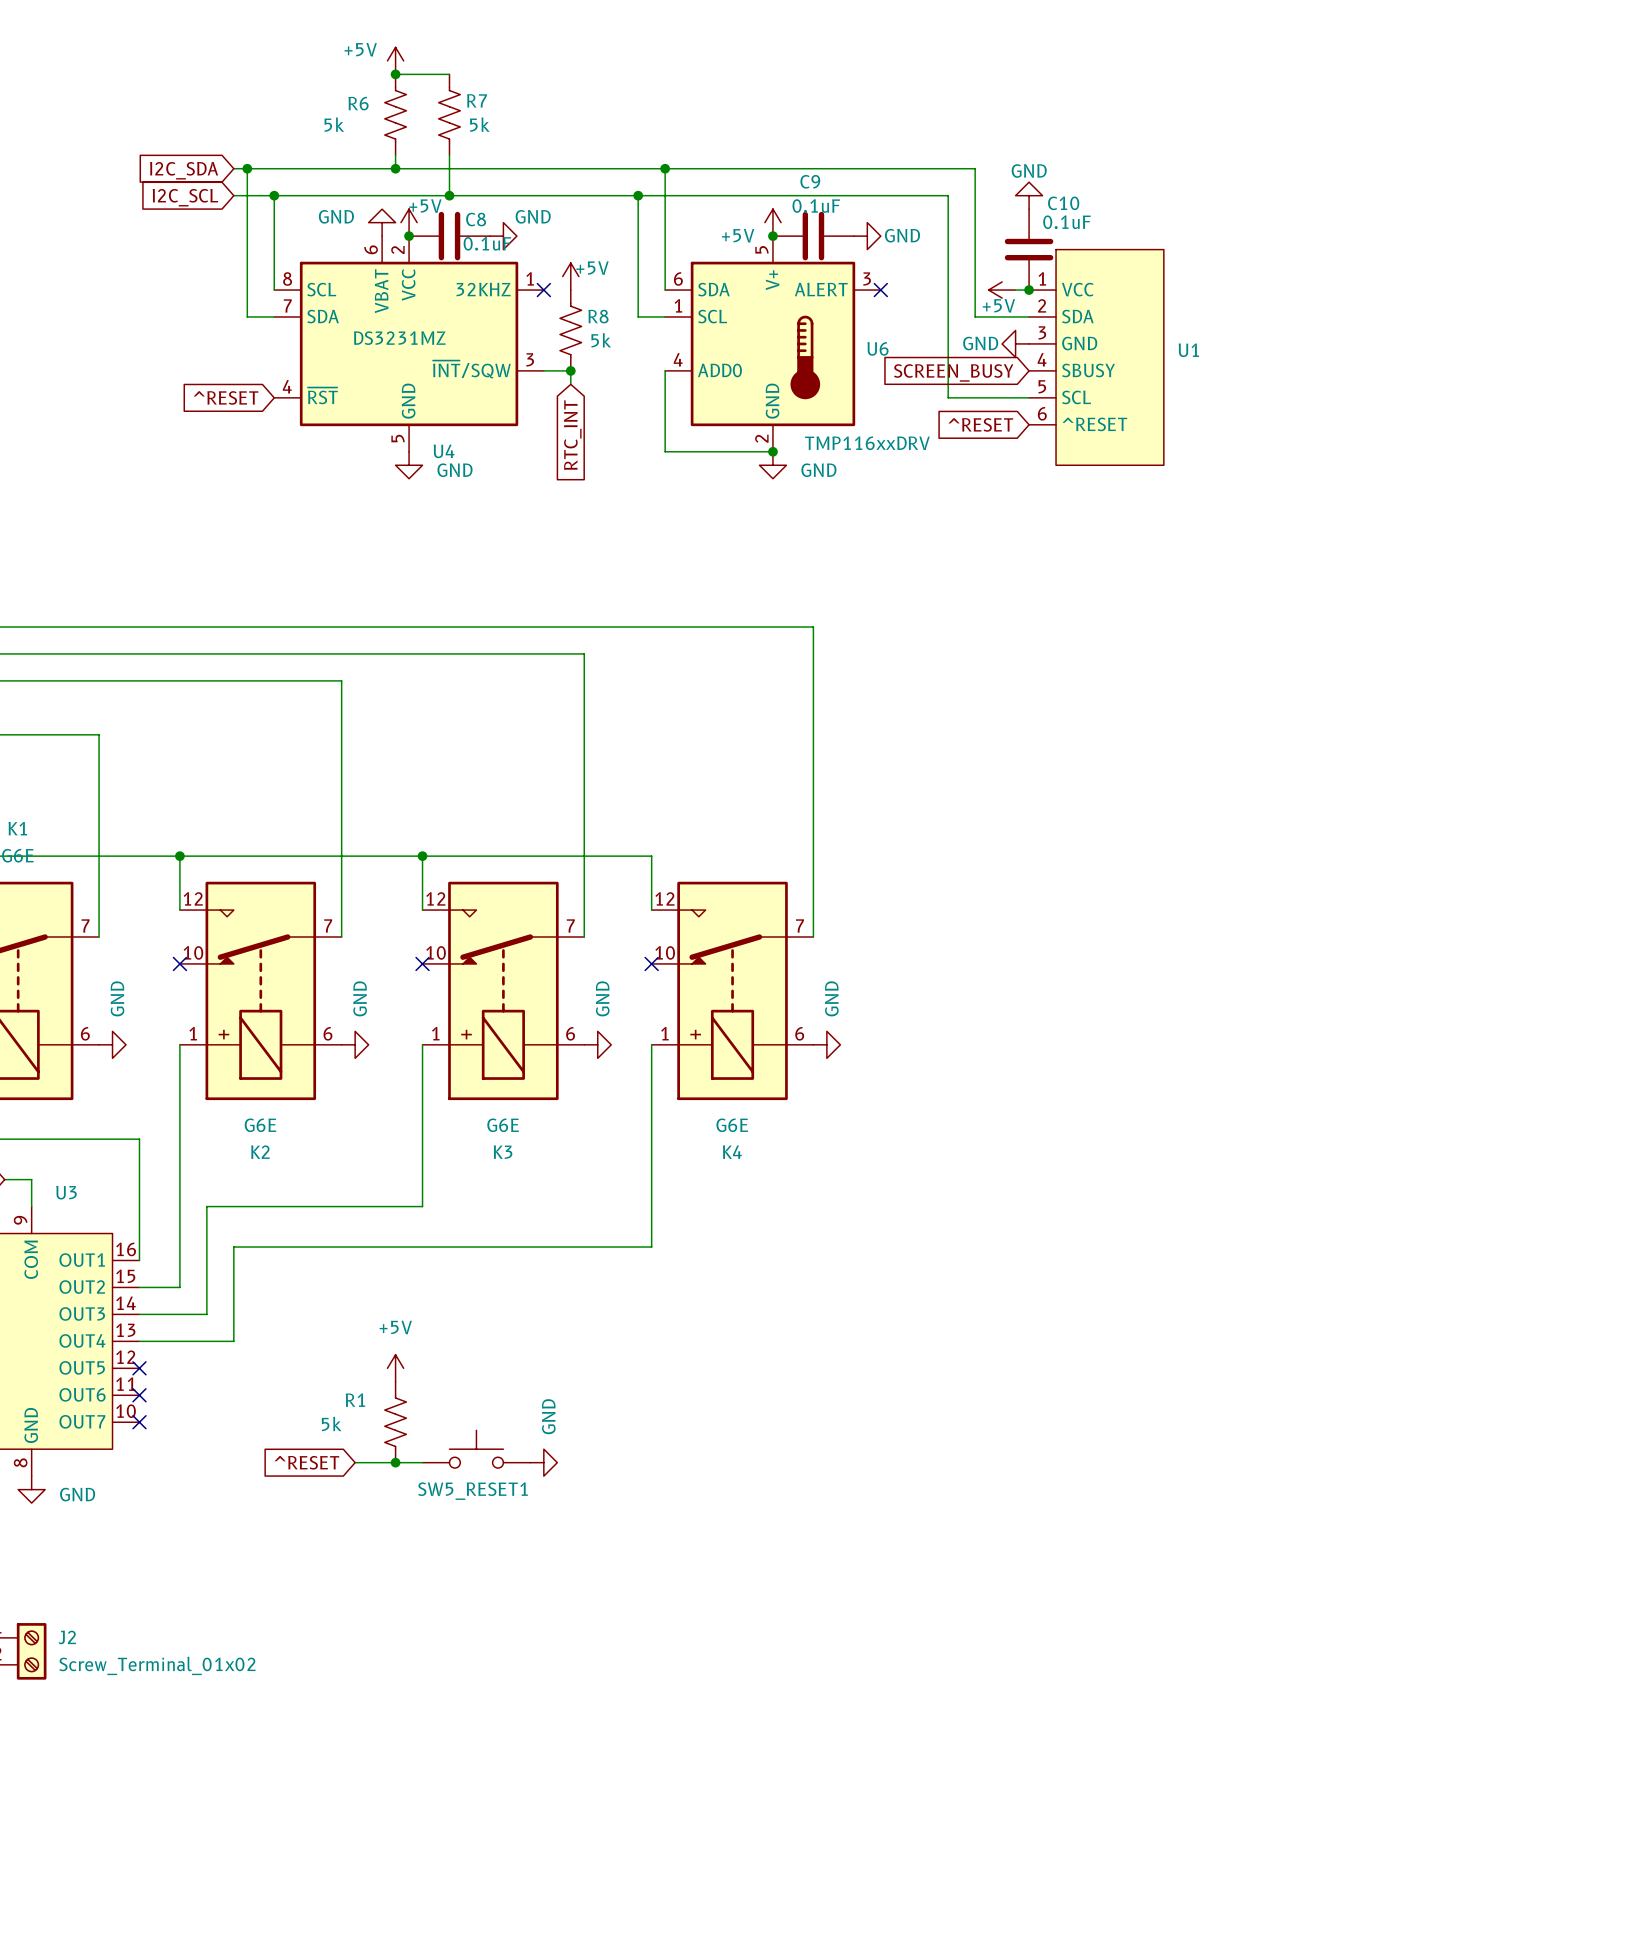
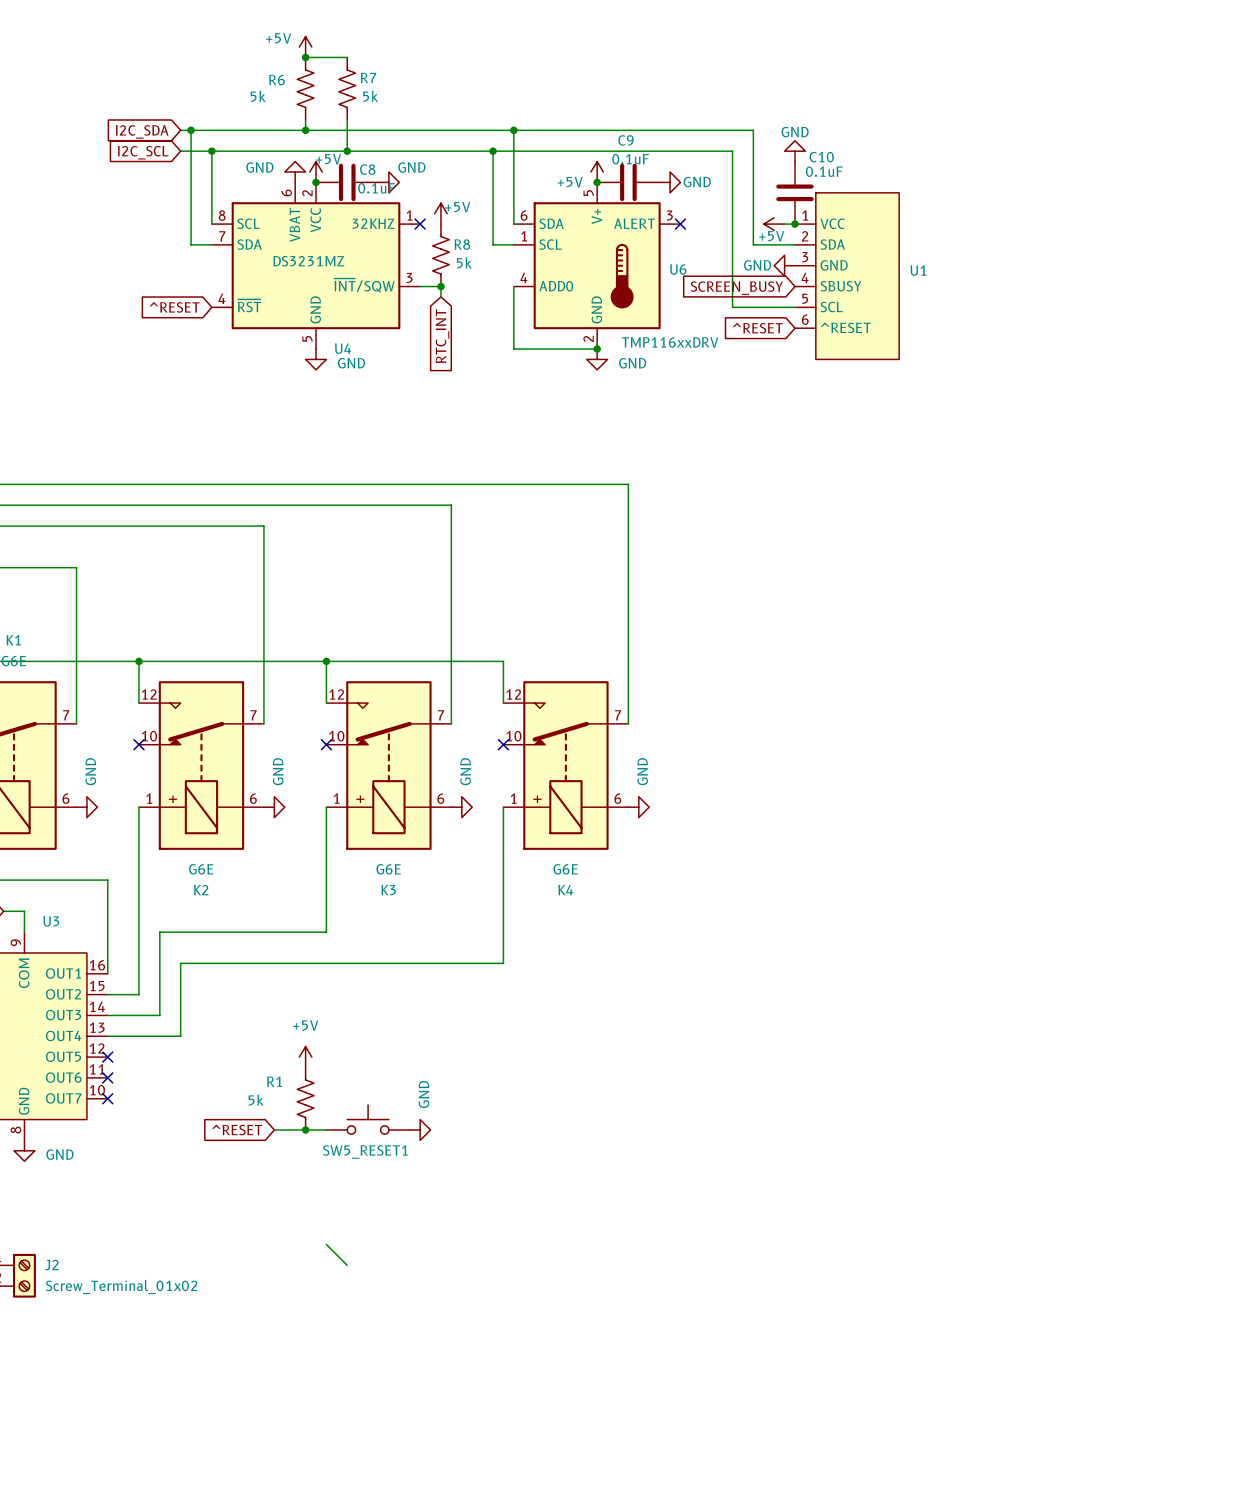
wire: none -> (326, 1244) (347, 1265)

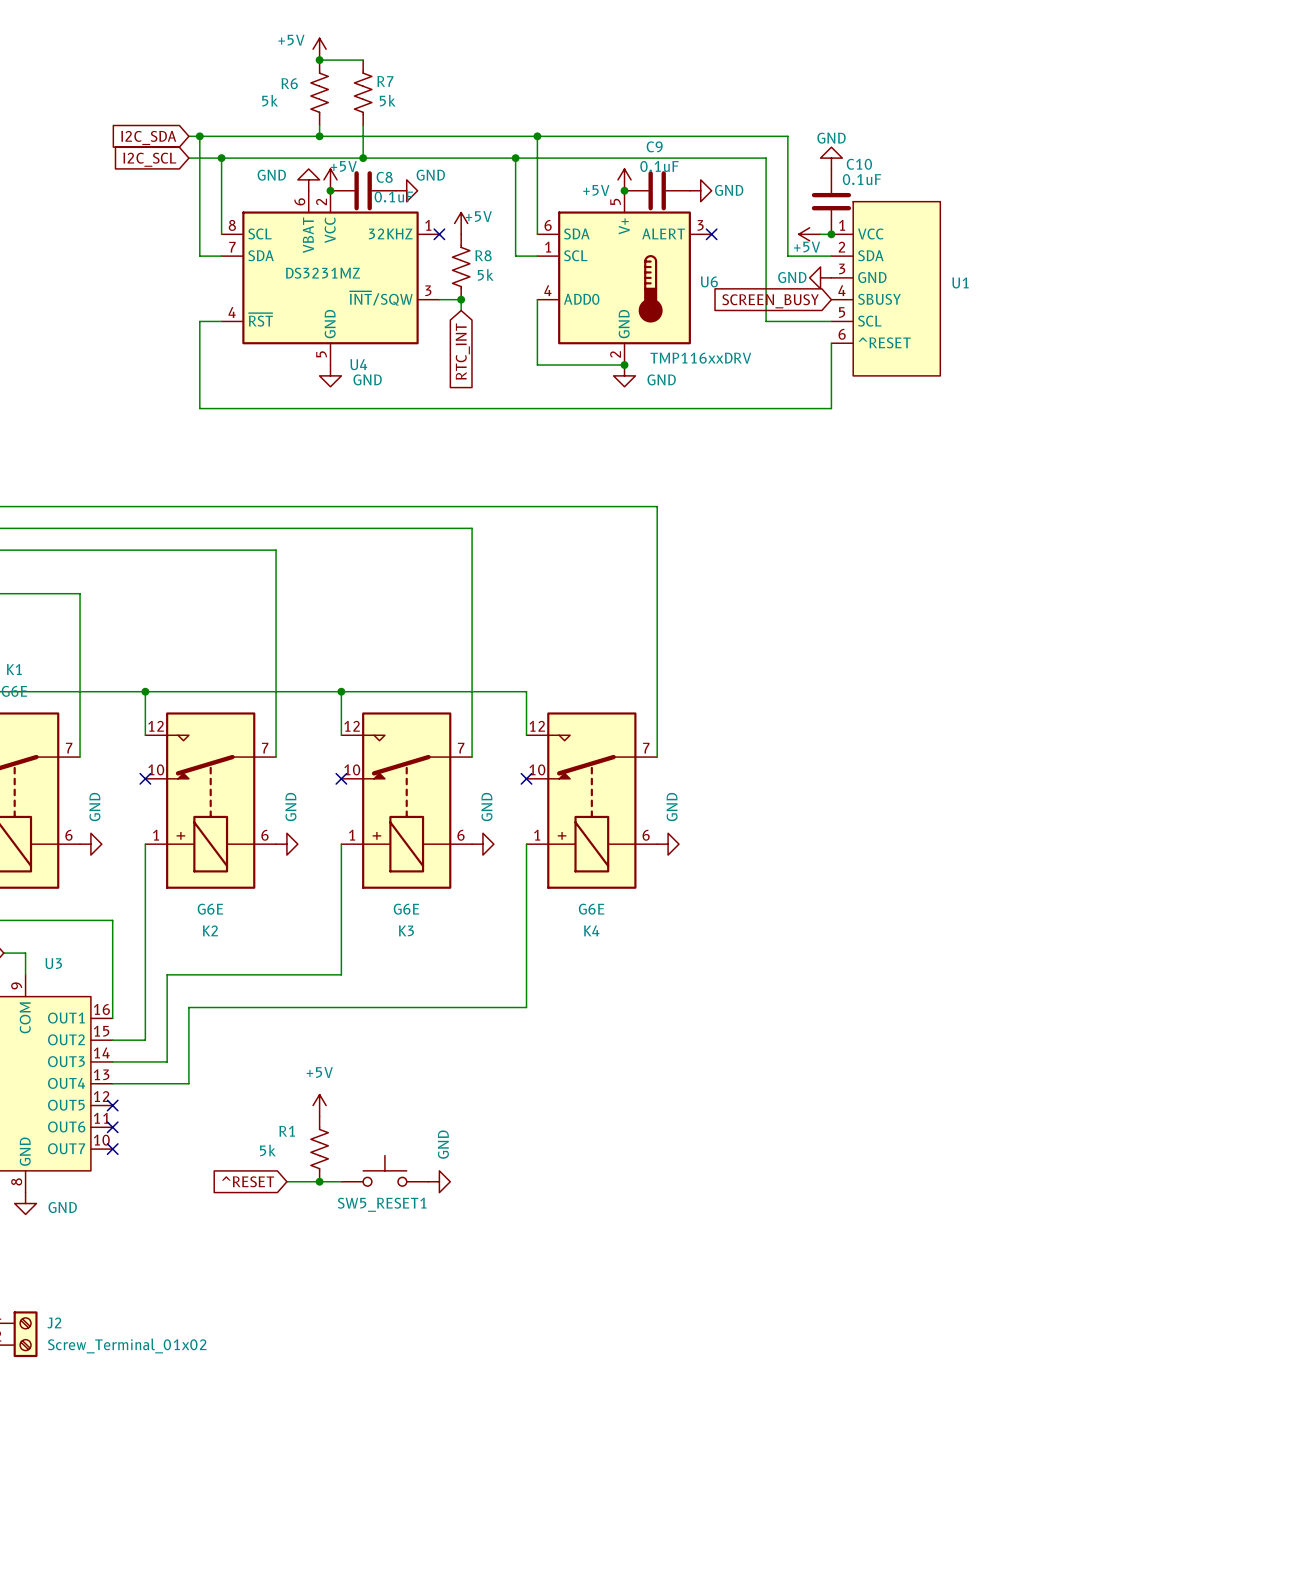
global label: ^RESET (174, 307) -> none
wire: none -> (221, 321) (199, 321) (199, 408) (831, 408) (831, 343)
global label: ^RESET (757, 328) -> none
wire: (326, 1244) (347, 1265) -> none

